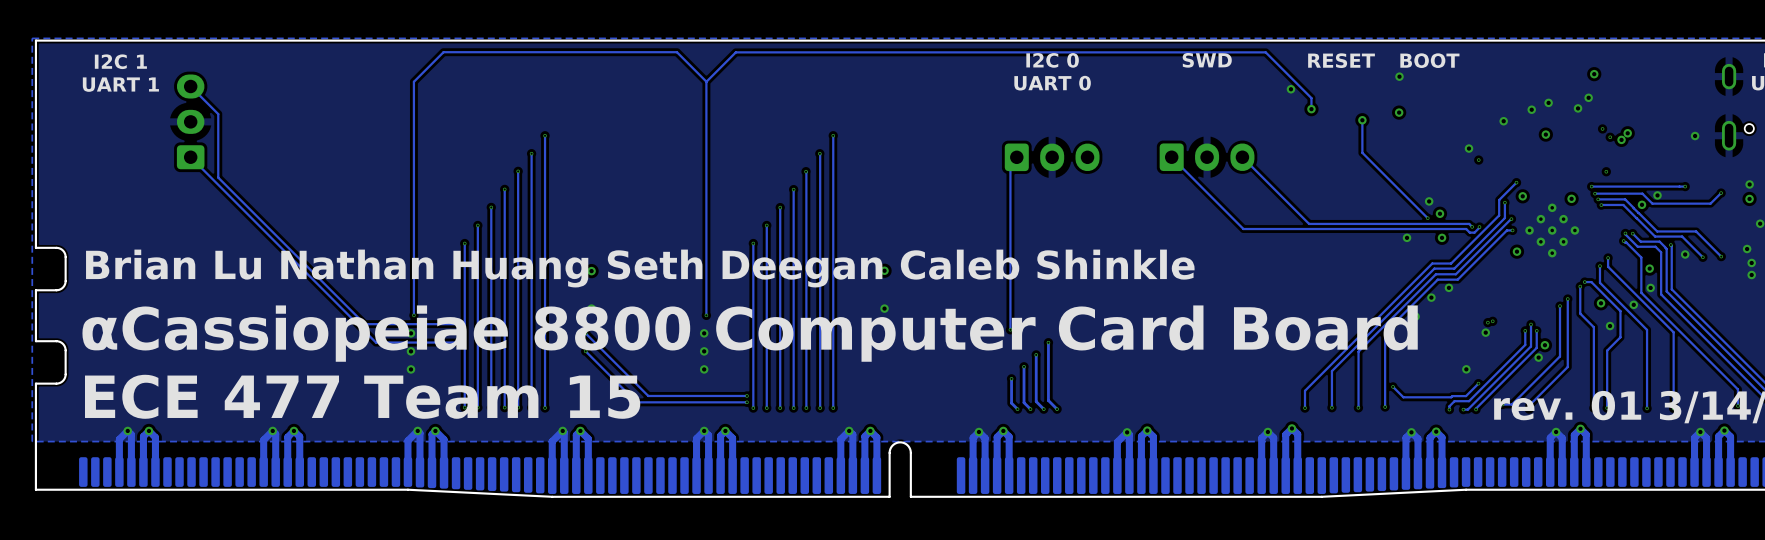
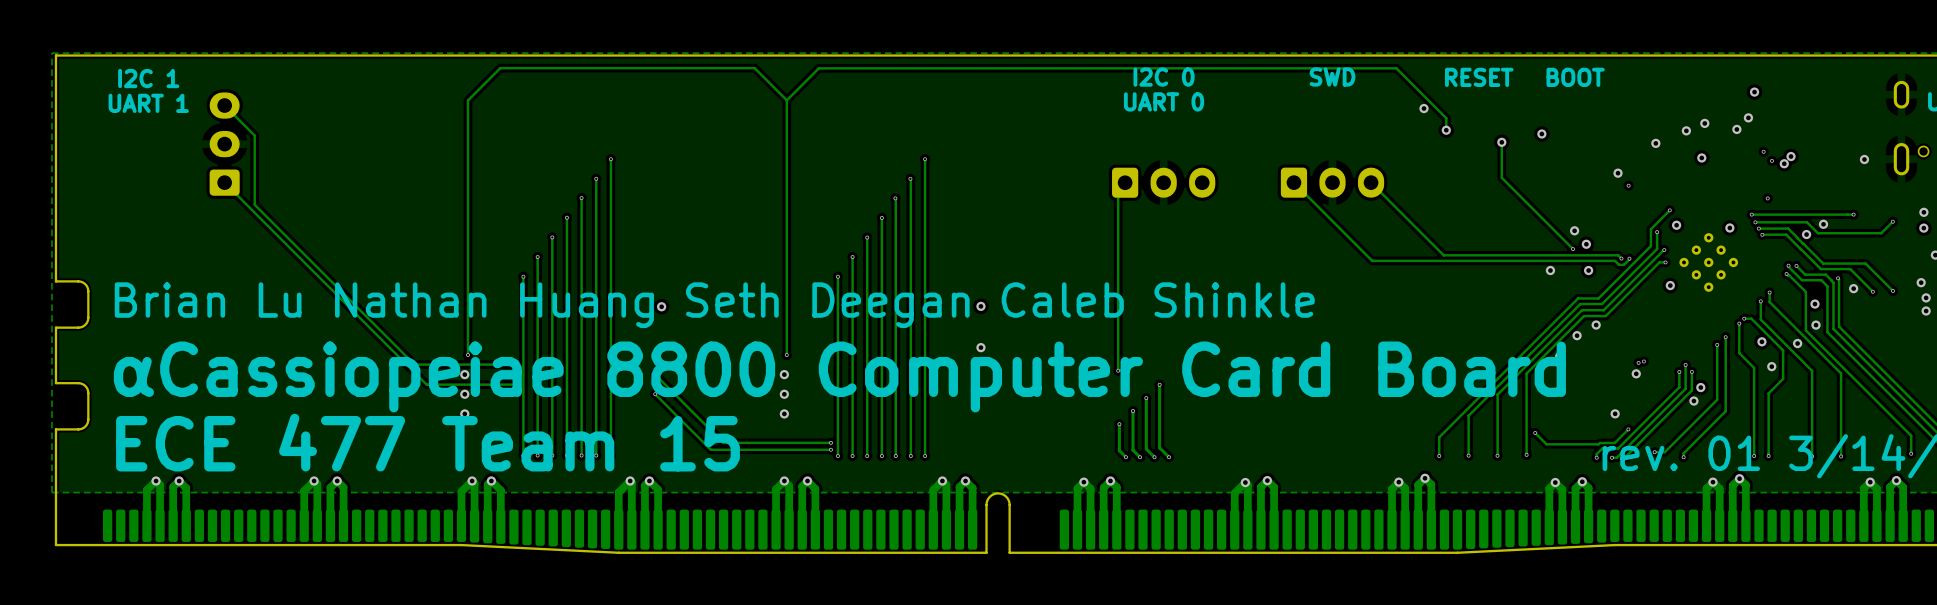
via: (1399, 76) -> none

